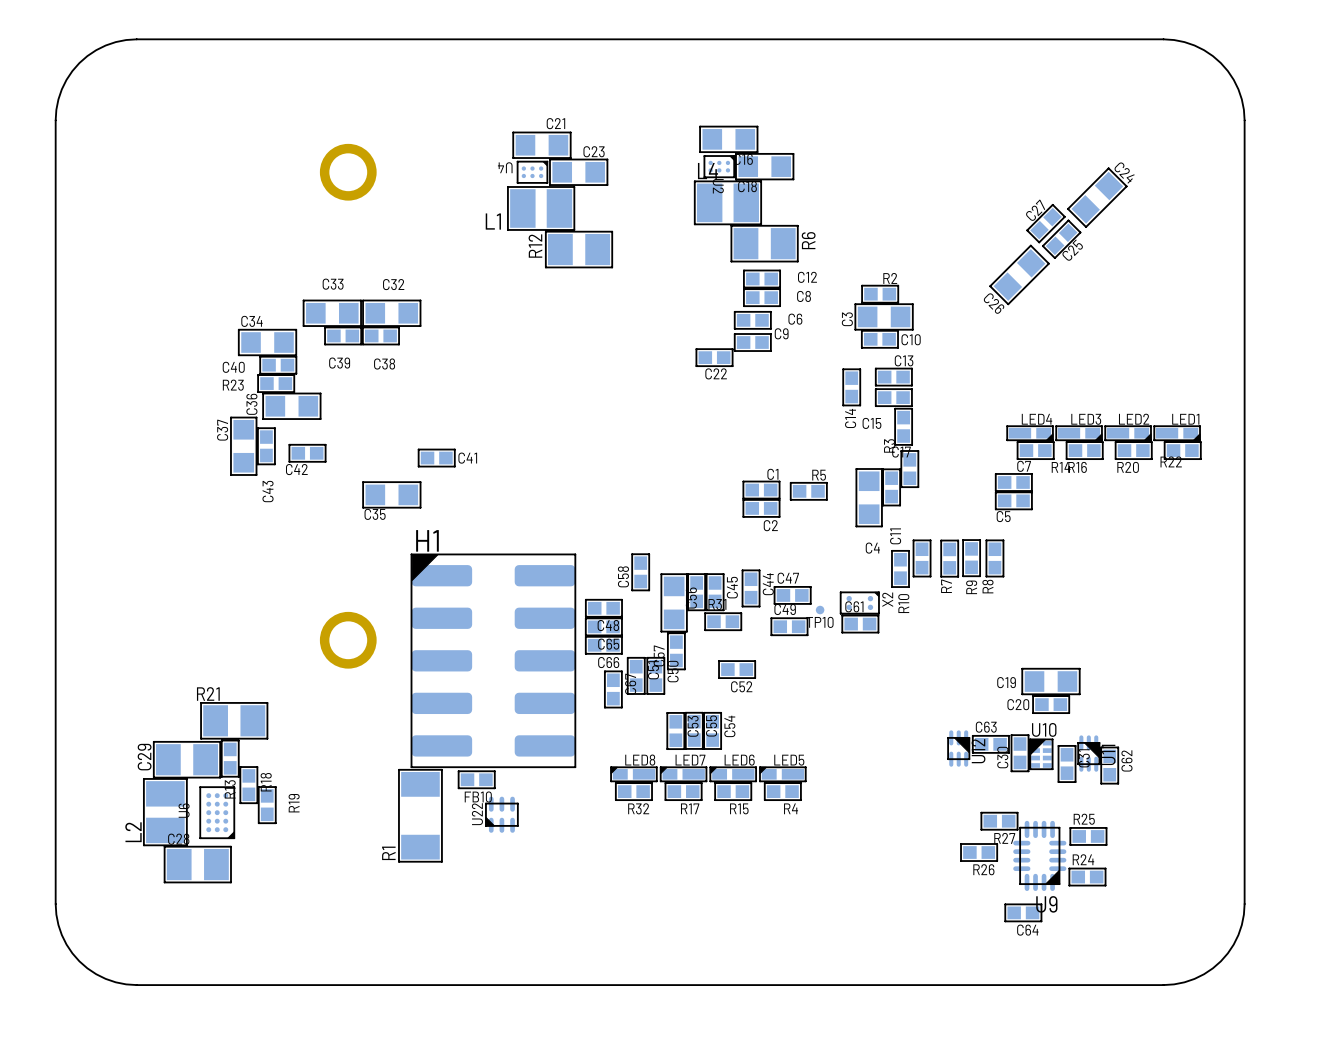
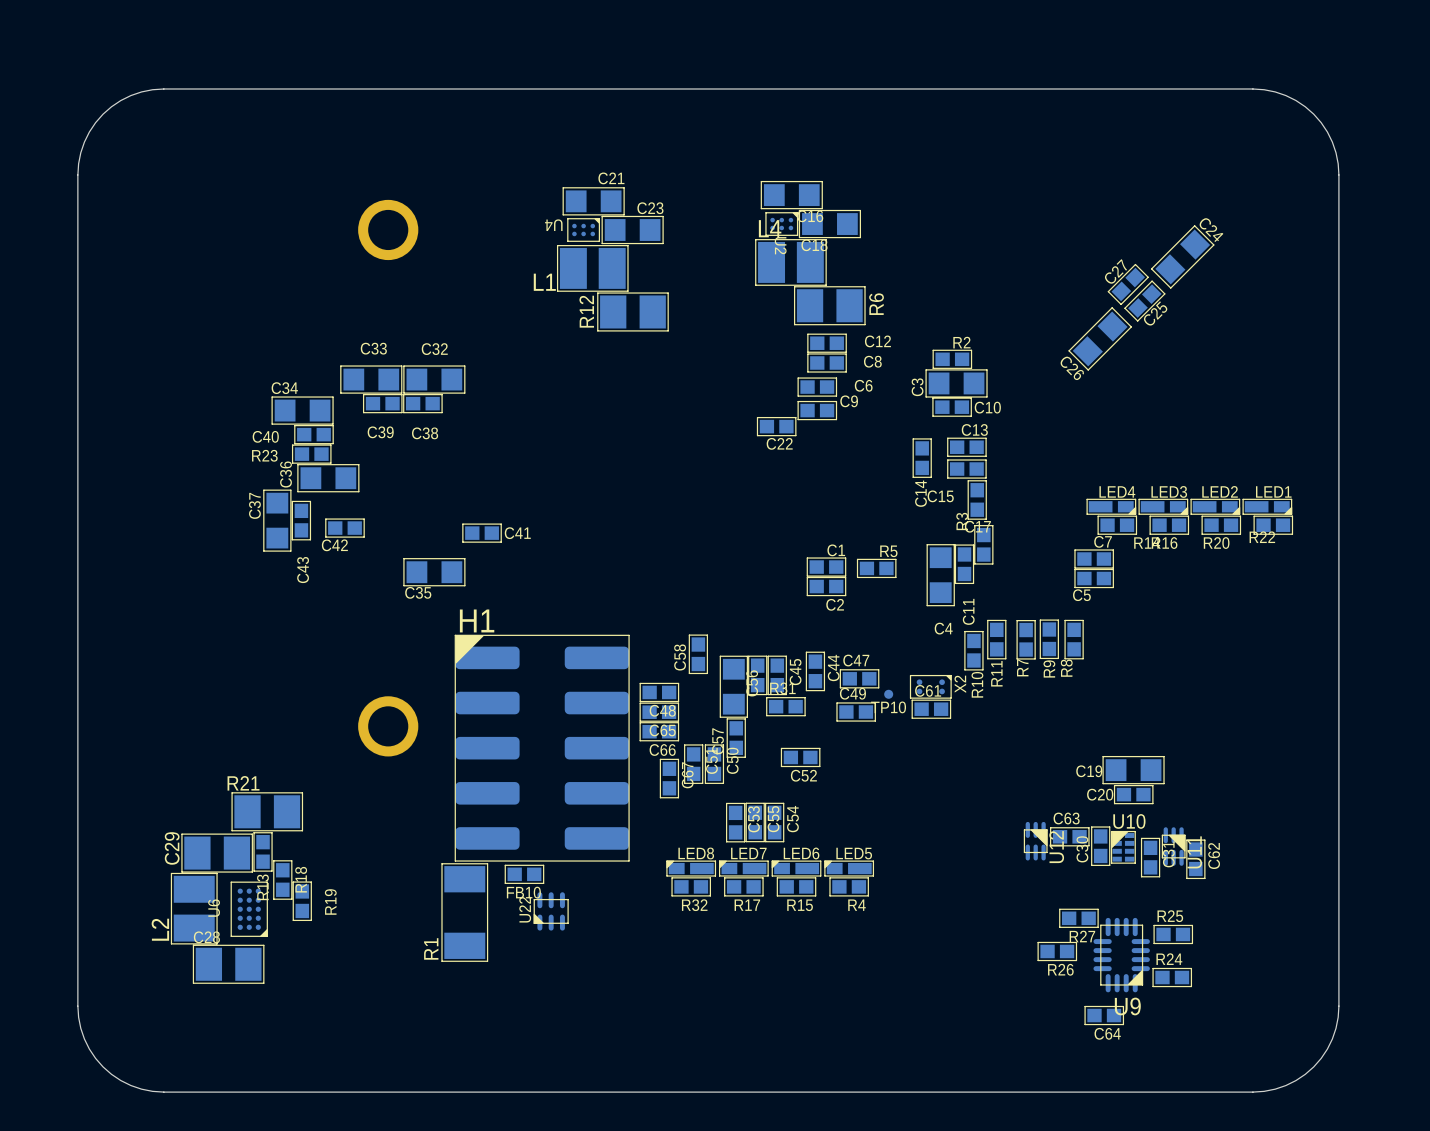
R11 name: none -> R11 (996, 673)

